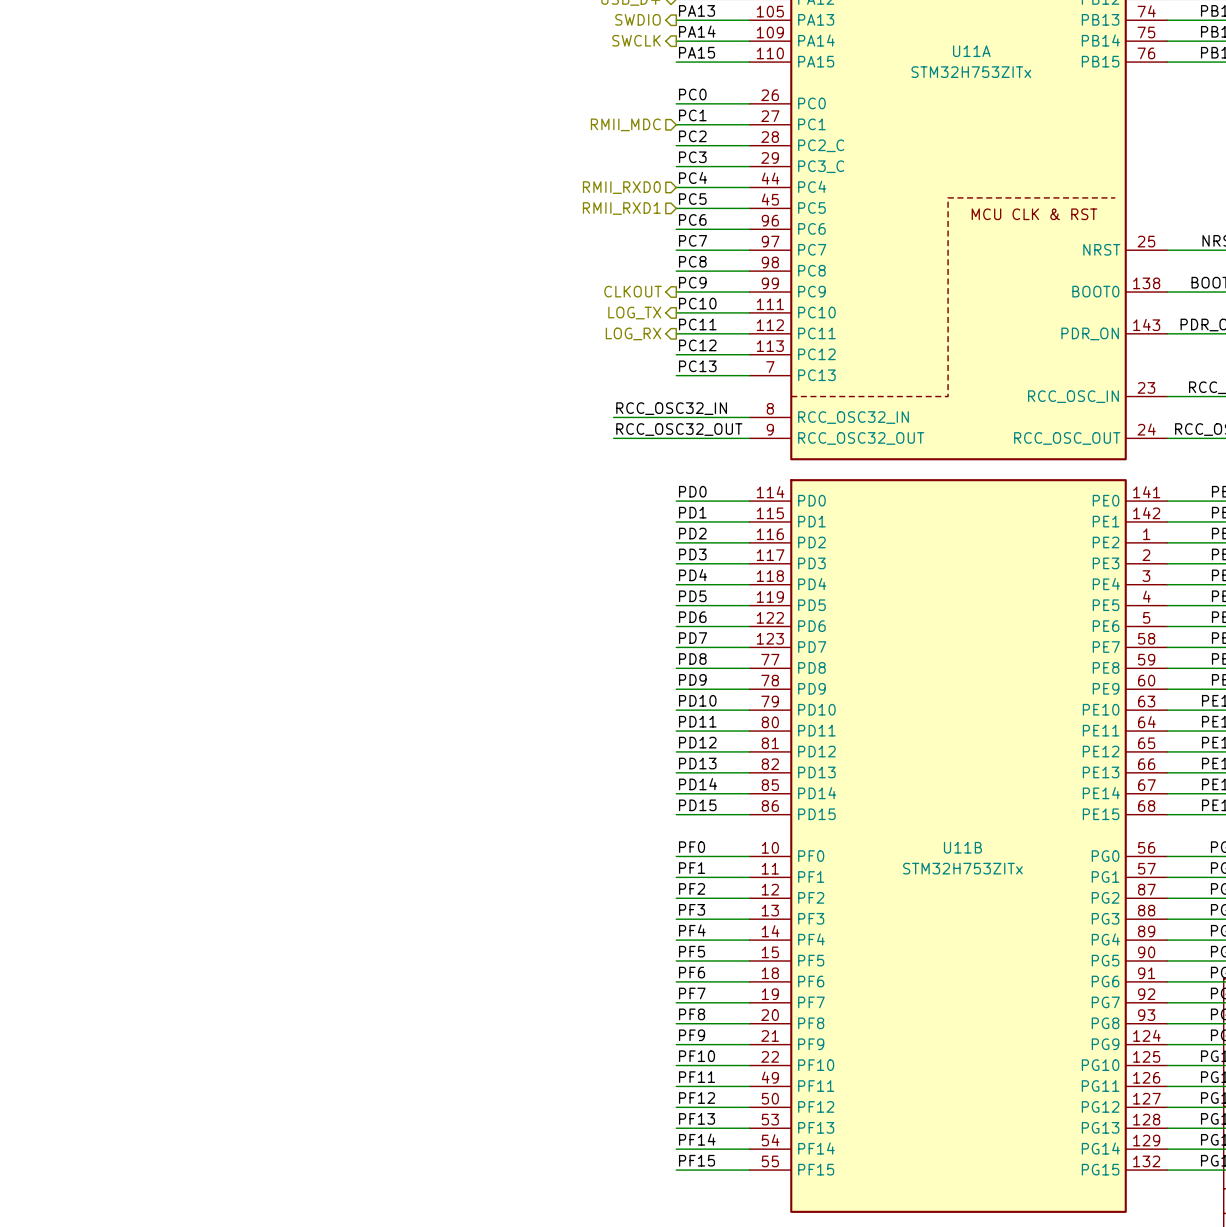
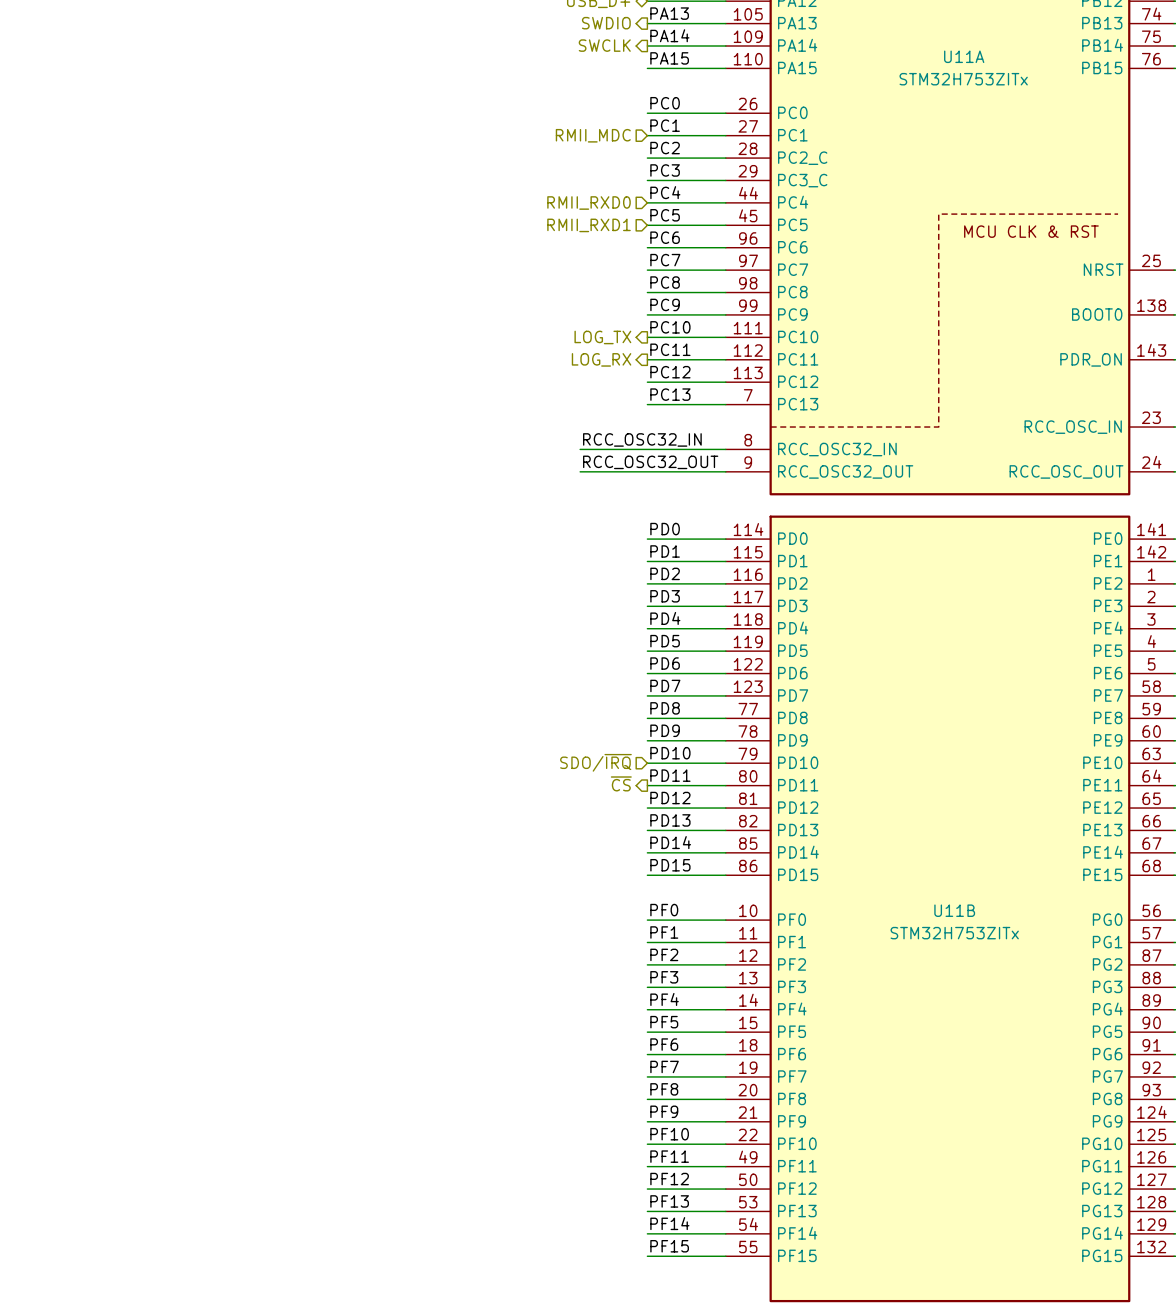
hierarchical label: CLKOUT (633, 291) -> none
hierarchical label: none -> SDO/~{IRQ} (595, 762)
hierarchical label: none -> ~{CS} (621, 783)

